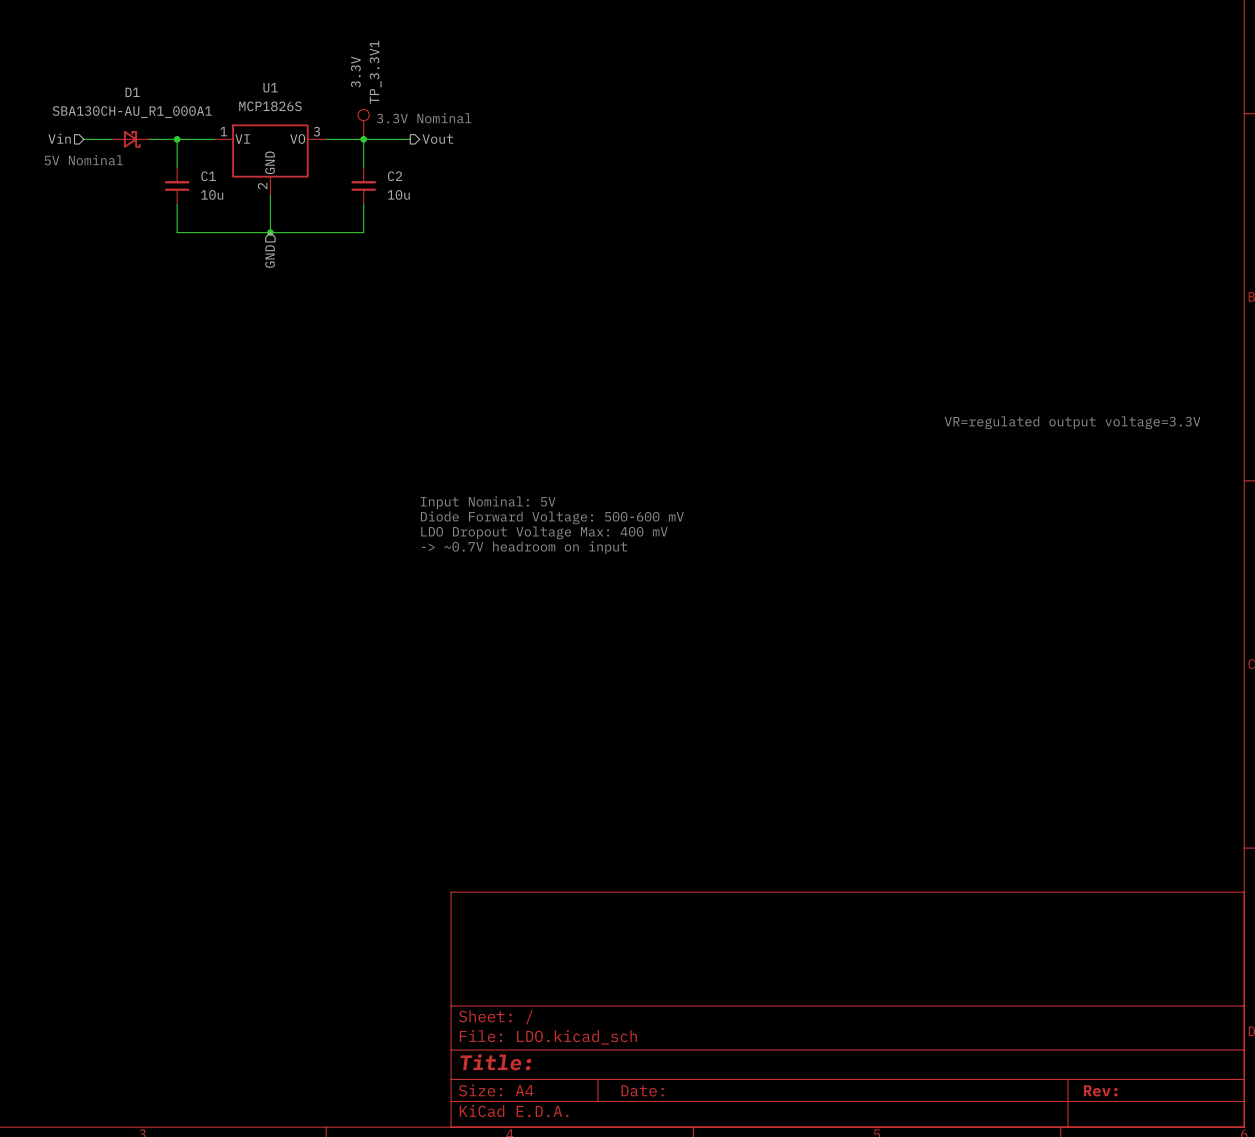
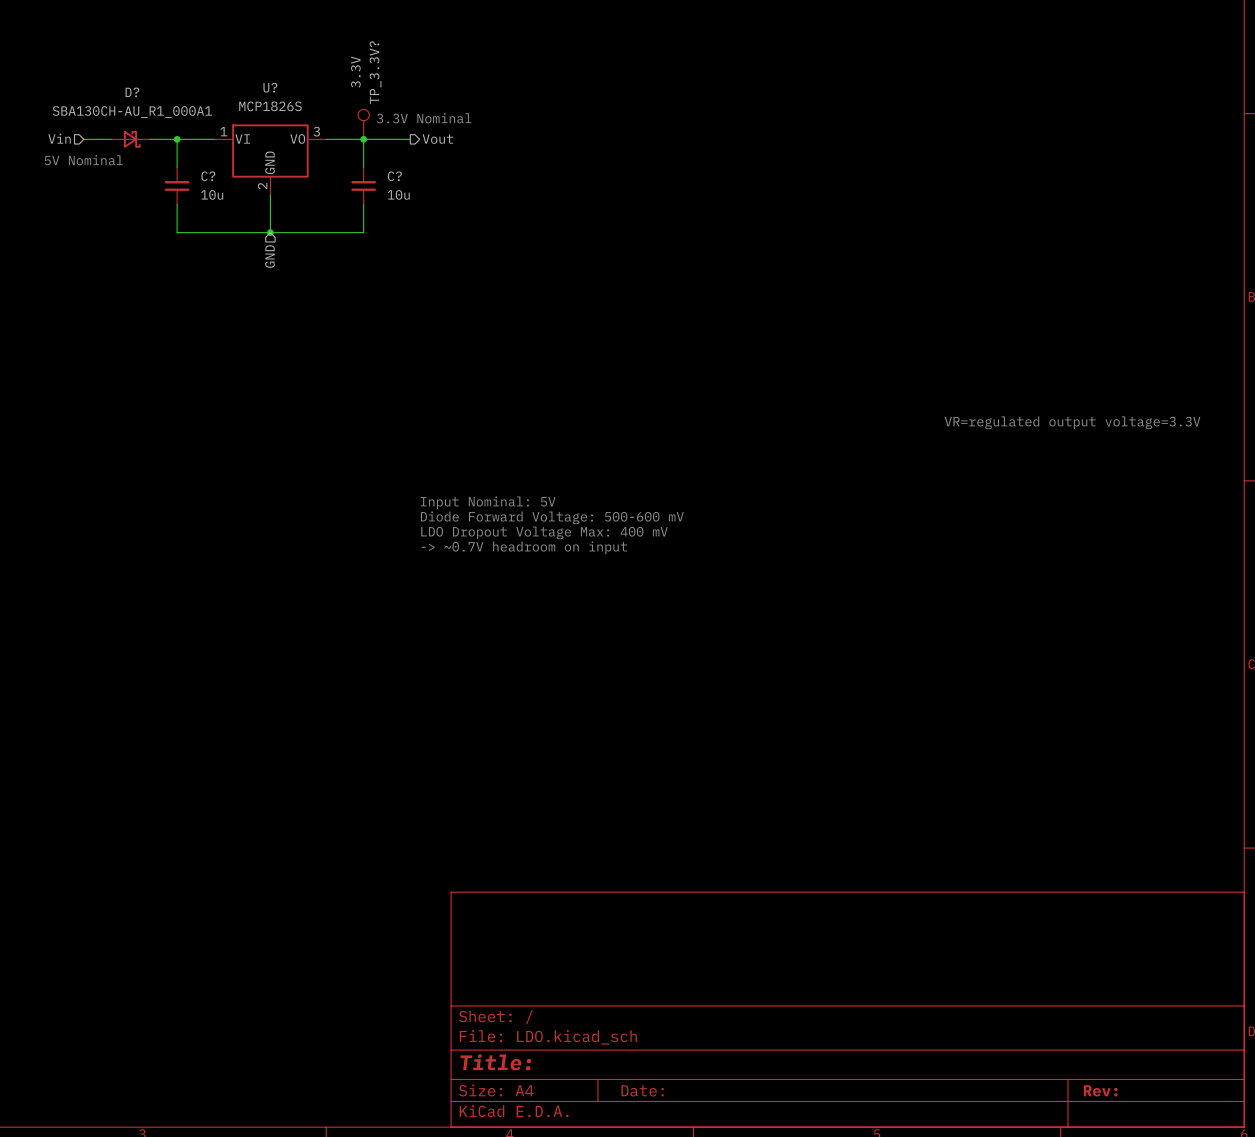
TP_3.3V1 name: TP_3.3V1 (375, 72) -> TP_3.3V? (375, 72)
U1 name: U1 (270, 87) -> U? (270, 87)
D1 name: D1 (132, 92) -> D? (132, 92)
C1 name: C1 (208, 176) -> C? (208, 176)
C2 name: C2 (395, 176) -> C? (394, 176)

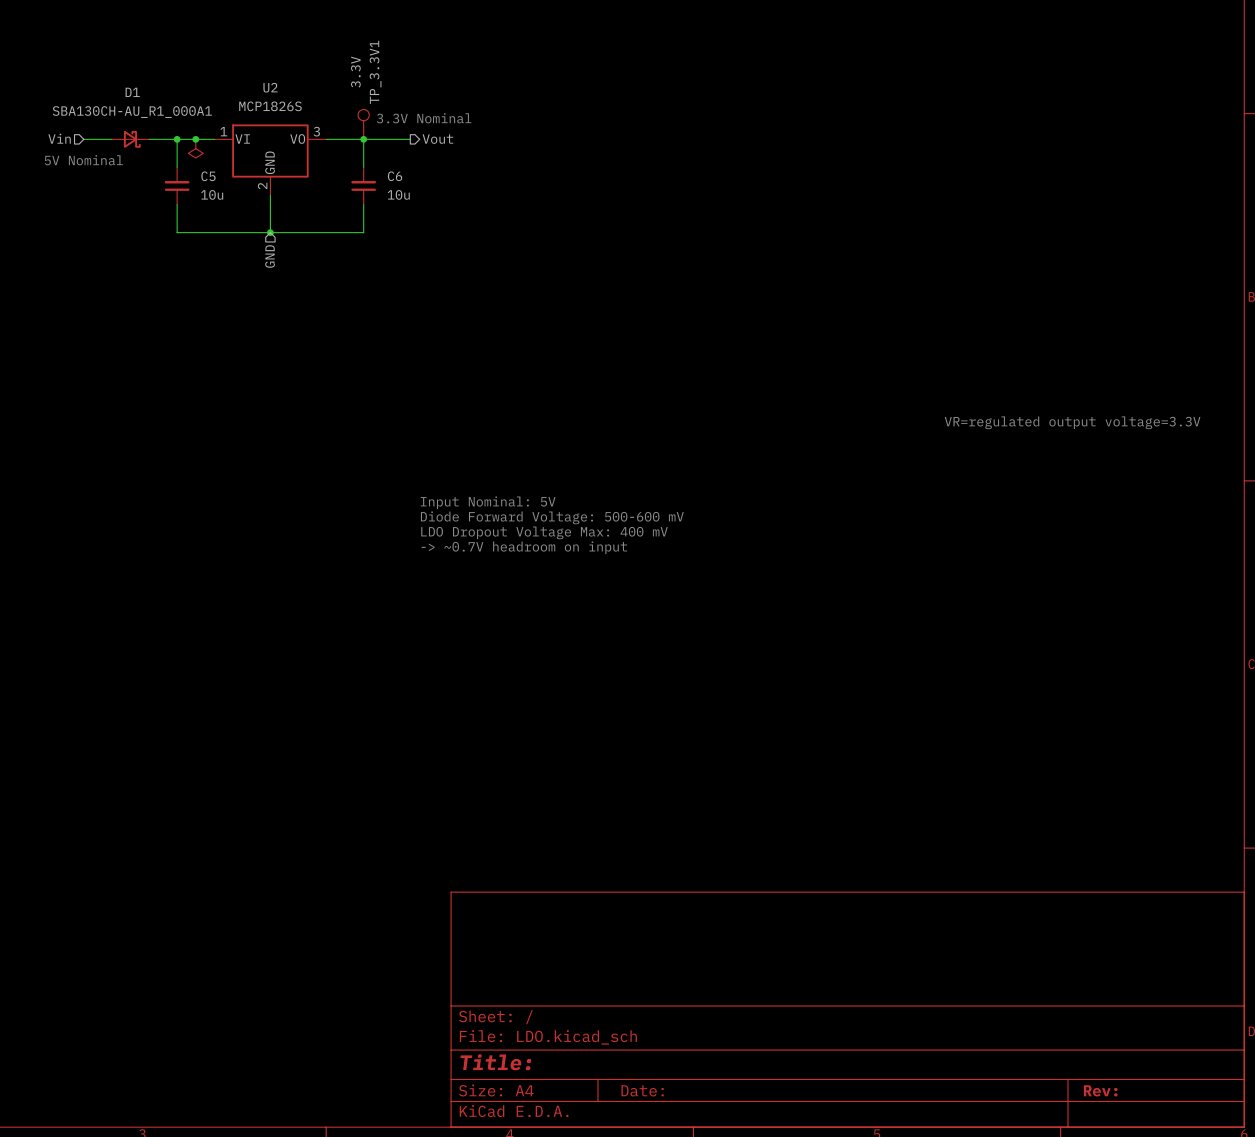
TP_3.3V? name: TP_3.3V? (375, 72) -> TP_3.3V1 (375, 72)
U? name: U? (270, 87) -> U2 (270, 87)
D? name: D? (132, 92) -> D1 (132, 92)
junction: none -> (195, 139)
power symbol: none -> (195, 148)
C? name: C? (208, 176) -> C5 (208, 176)
C? name: C? (394, 176) -> C6 (395, 176)

